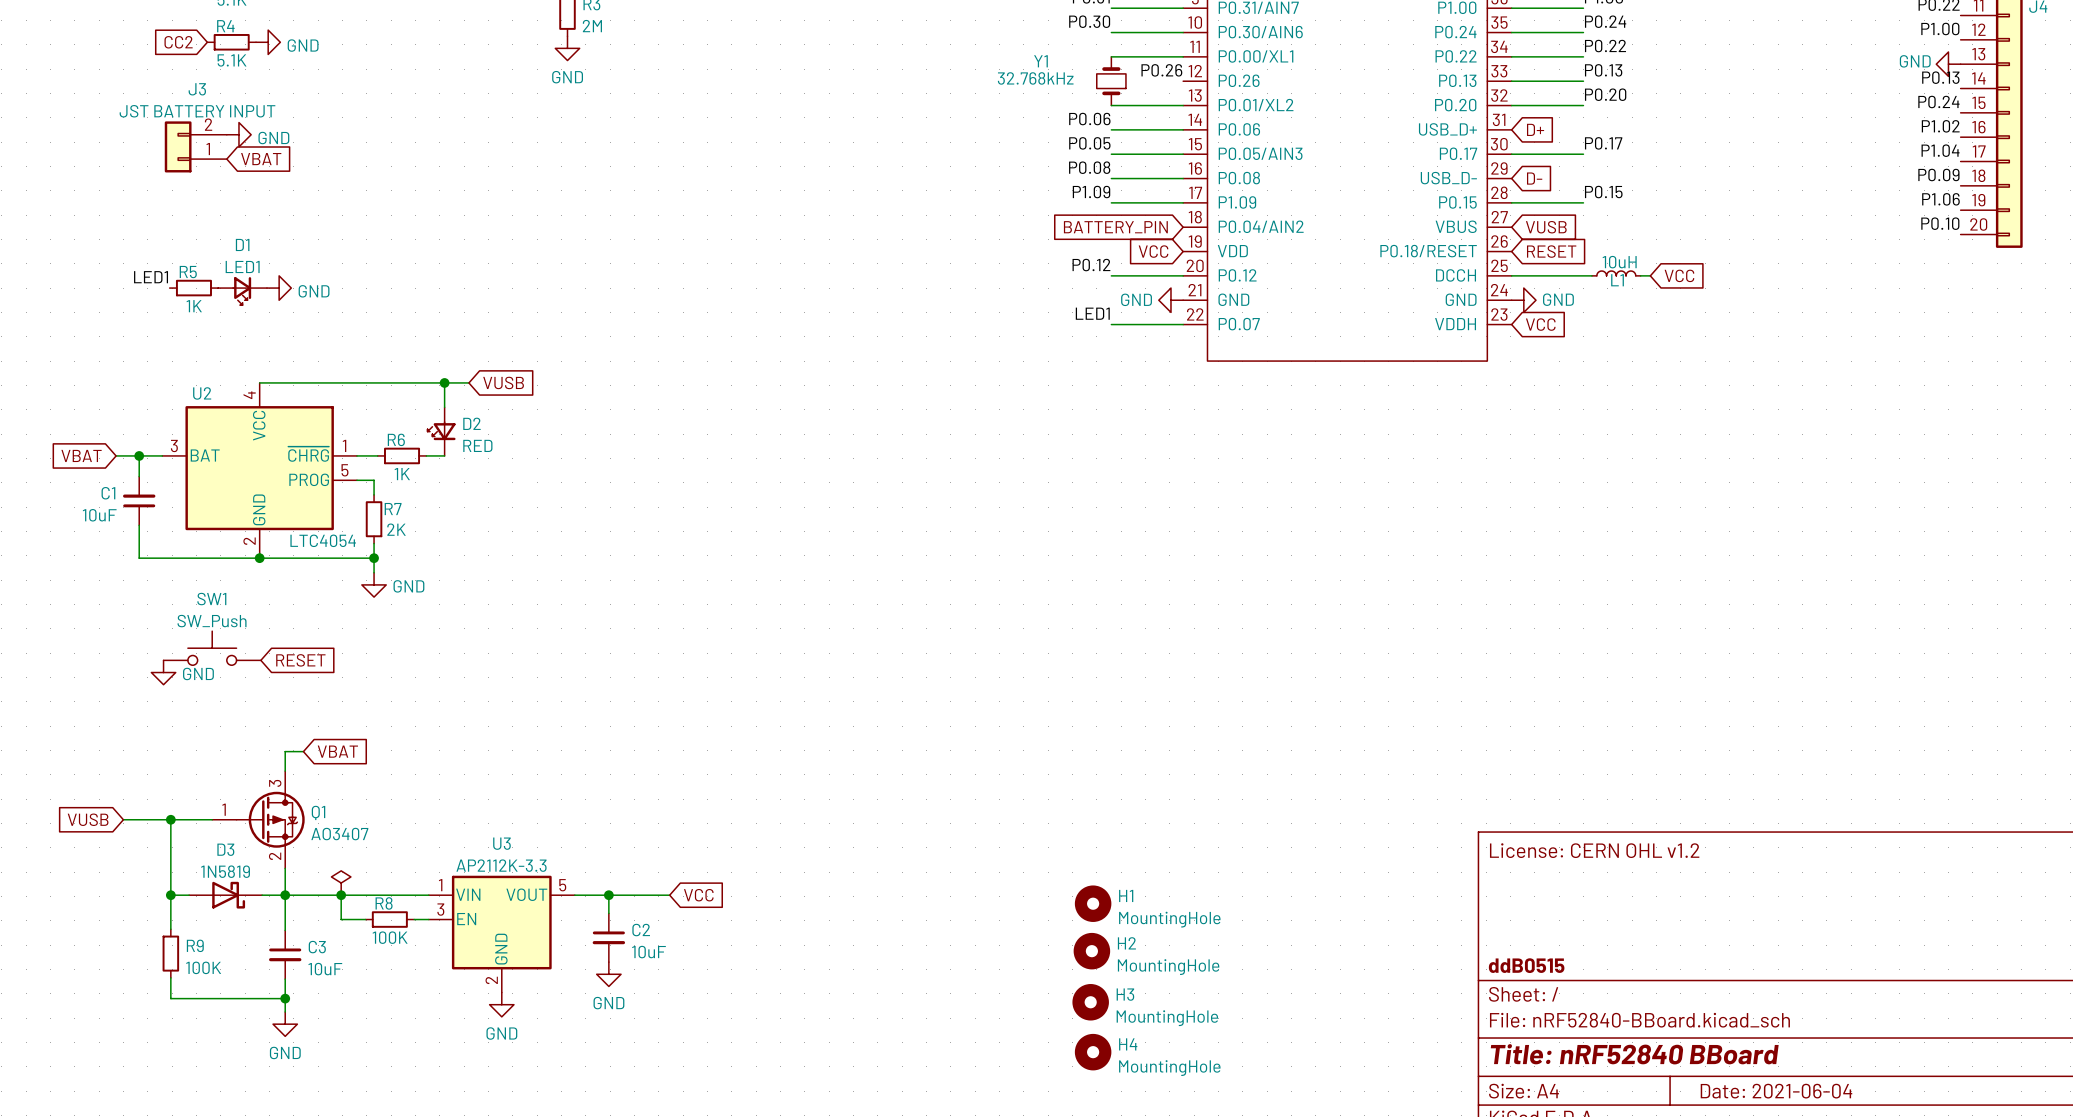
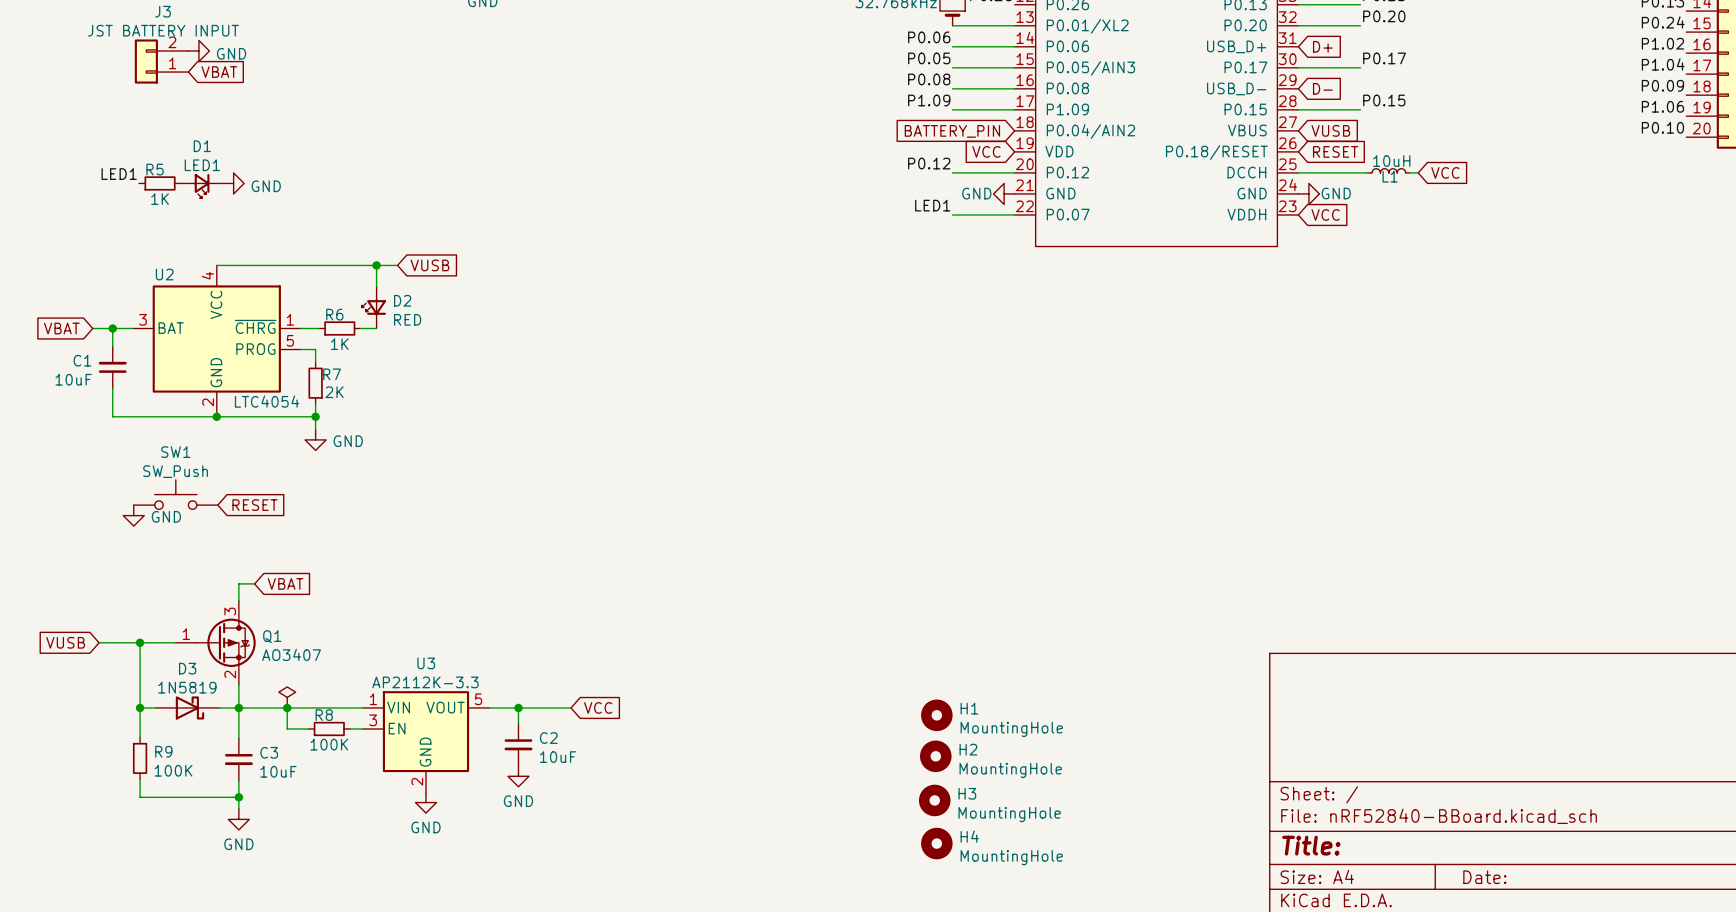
title block: License: CERN OHL v1.2 (1594, 850) -> none
title block: ddB0515 (1526, 965) -> none
title block: Title: nRF52840 BBoard (1634, 1054) -> Title: (1311, 845)
title block: Date: 2021-06-04 (1776, 1091) -> Date: (1484, 877)

